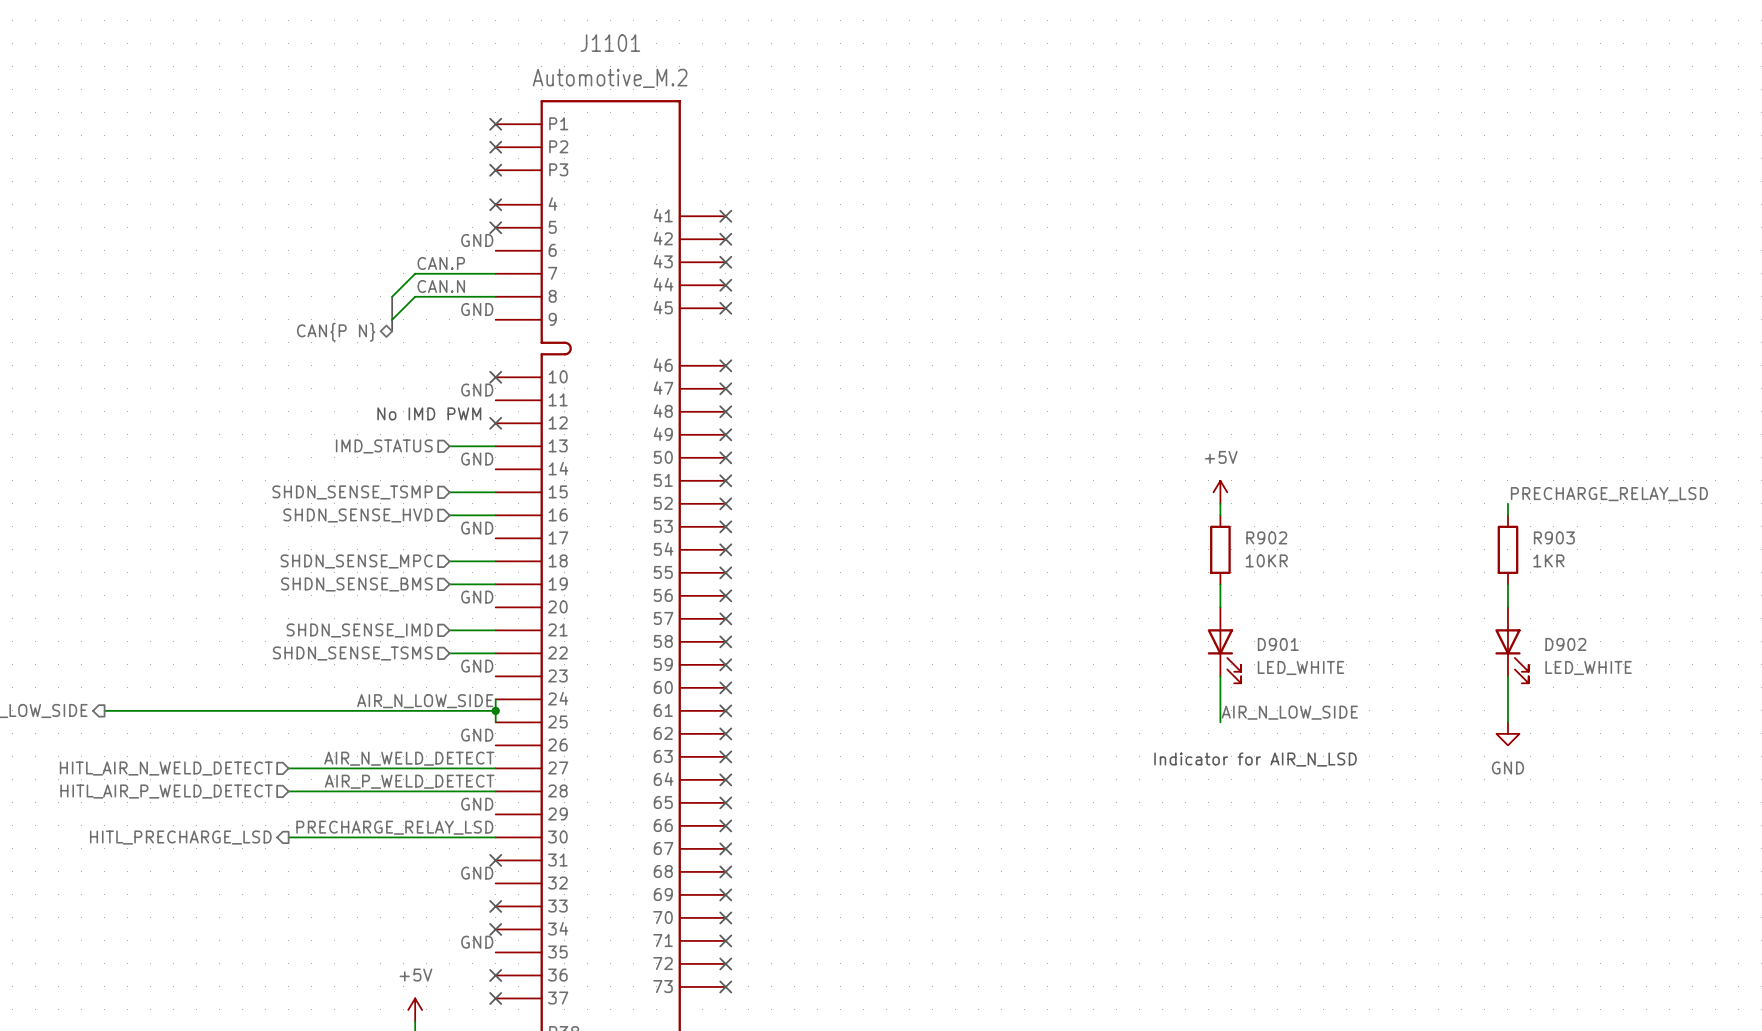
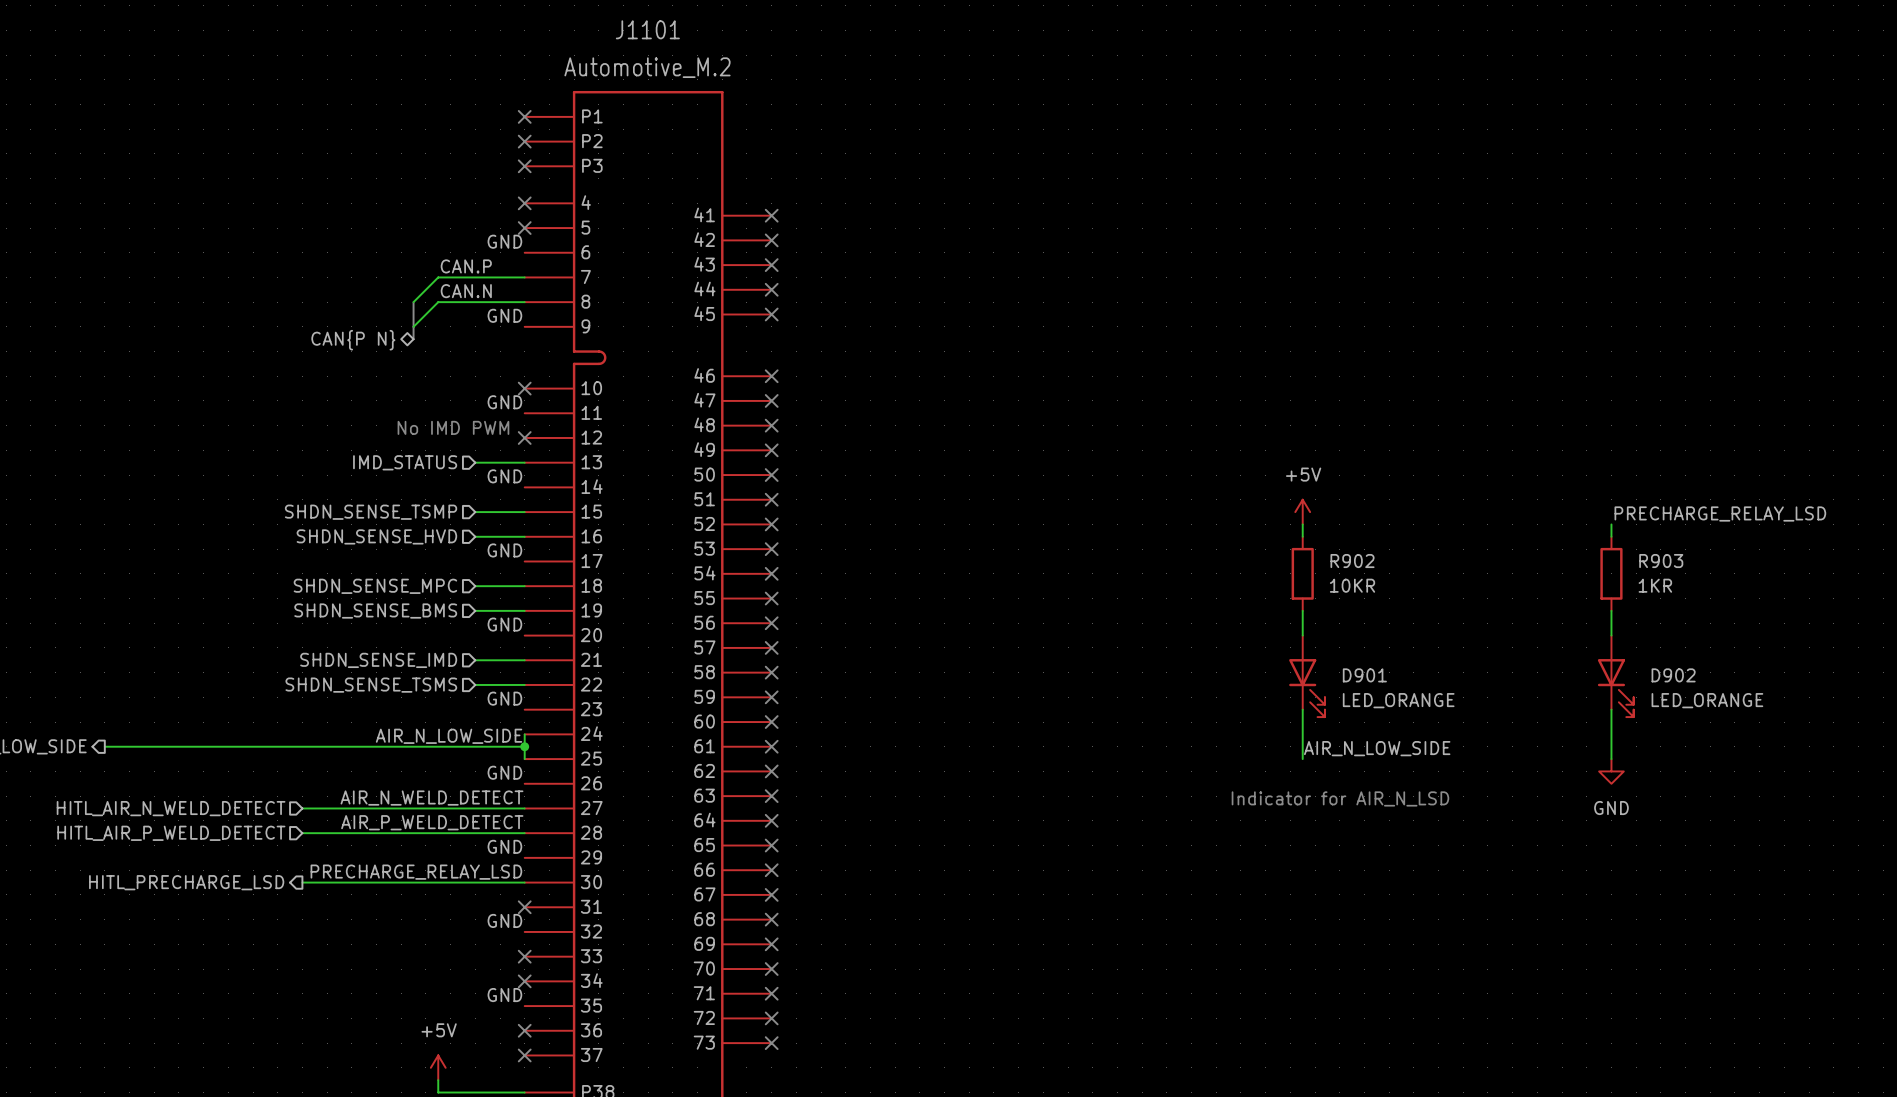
D901 value: LED_WHITE (1301, 667) -> LED_ORANGE (1398, 700)
D902 value: LED_WHITE (1588, 667) -> LED_ORANGE (1707, 700)

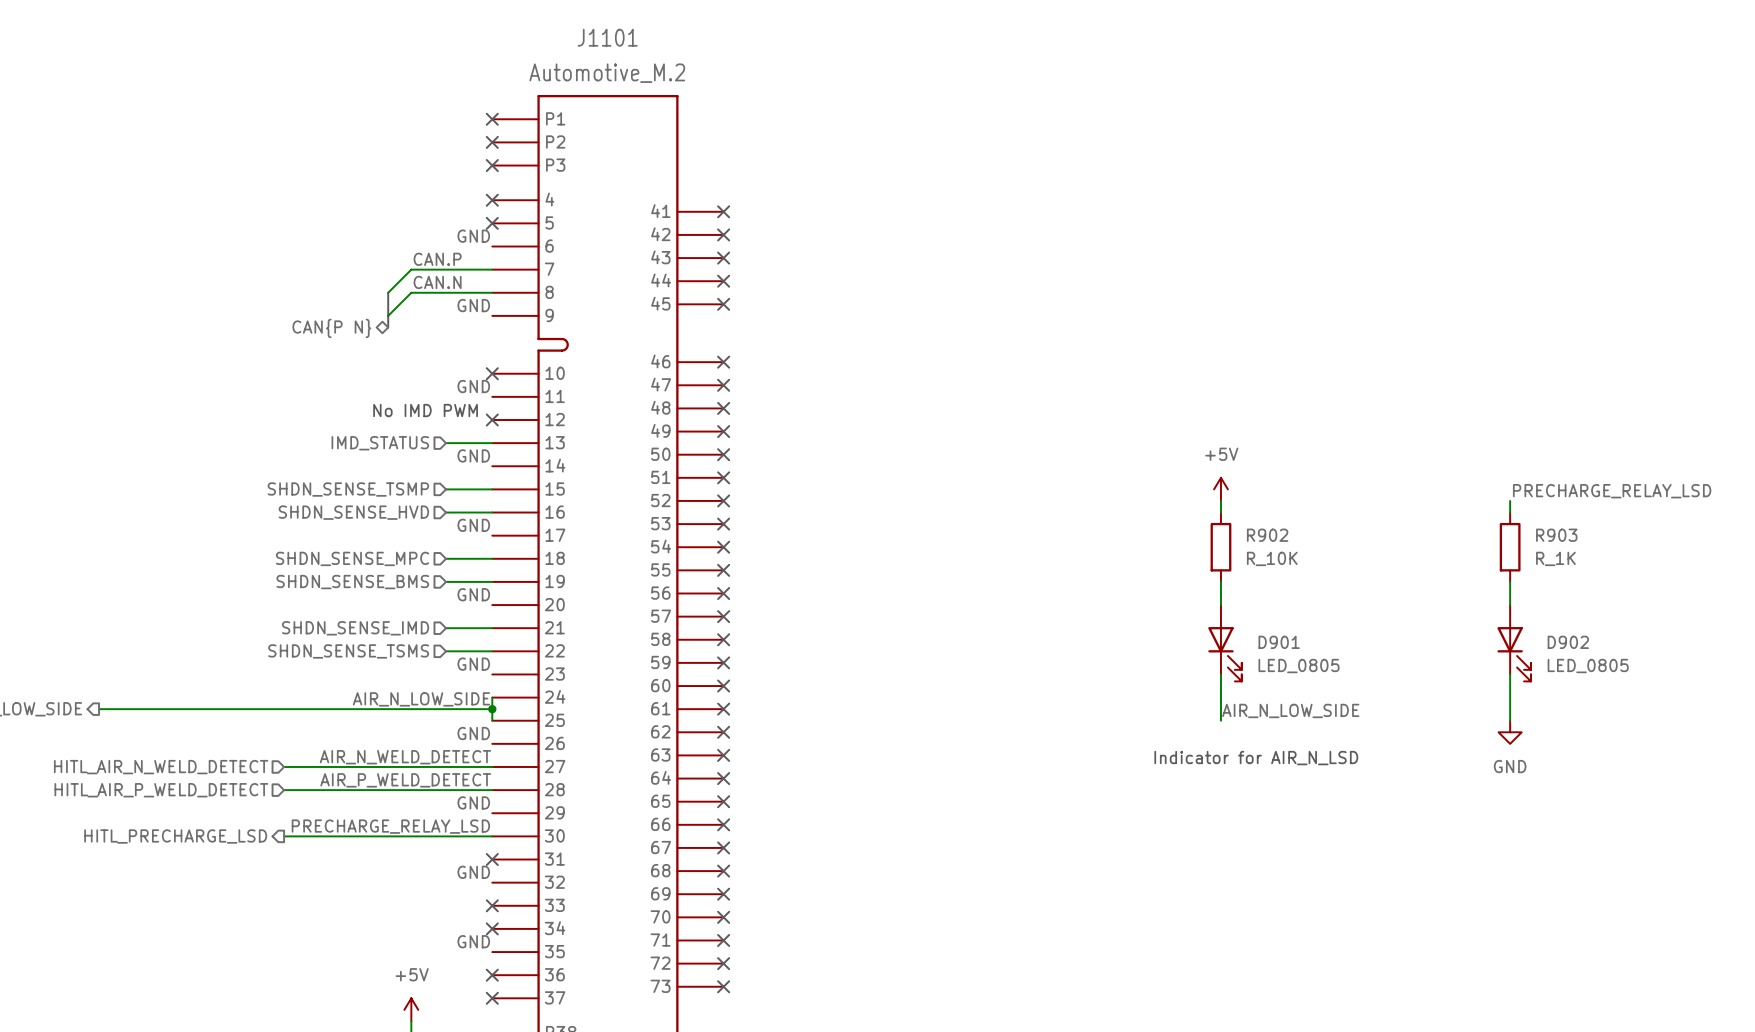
R902 value: 10KR (1352, 585) -> R_10K (1272, 558)
R903 value: 1KR (1655, 585) -> R_1K (1555, 558)
D901 value: LED_ORANGE (1398, 700) -> LED_0805 (1299, 666)
D902 value: LED_ORANGE (1707, 700) -> LED_0805 (1588, 666)

